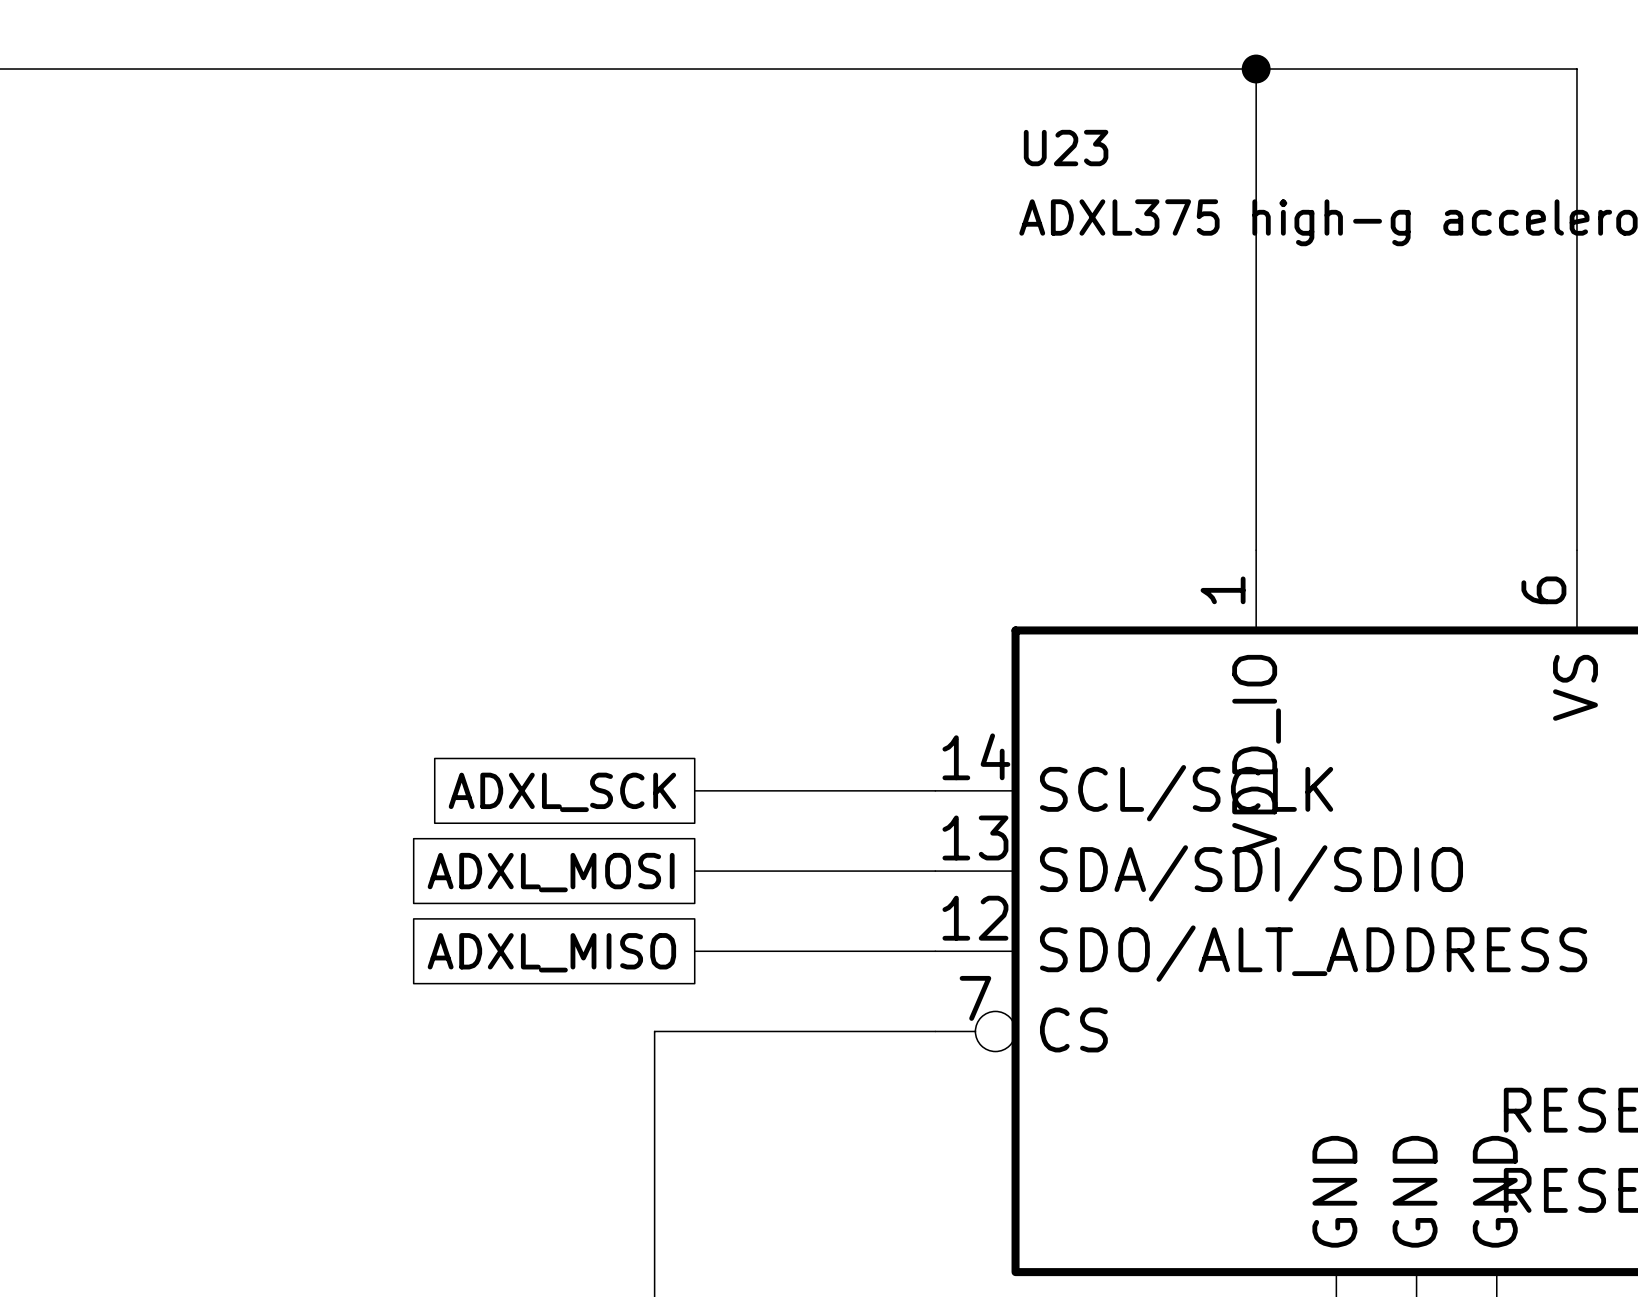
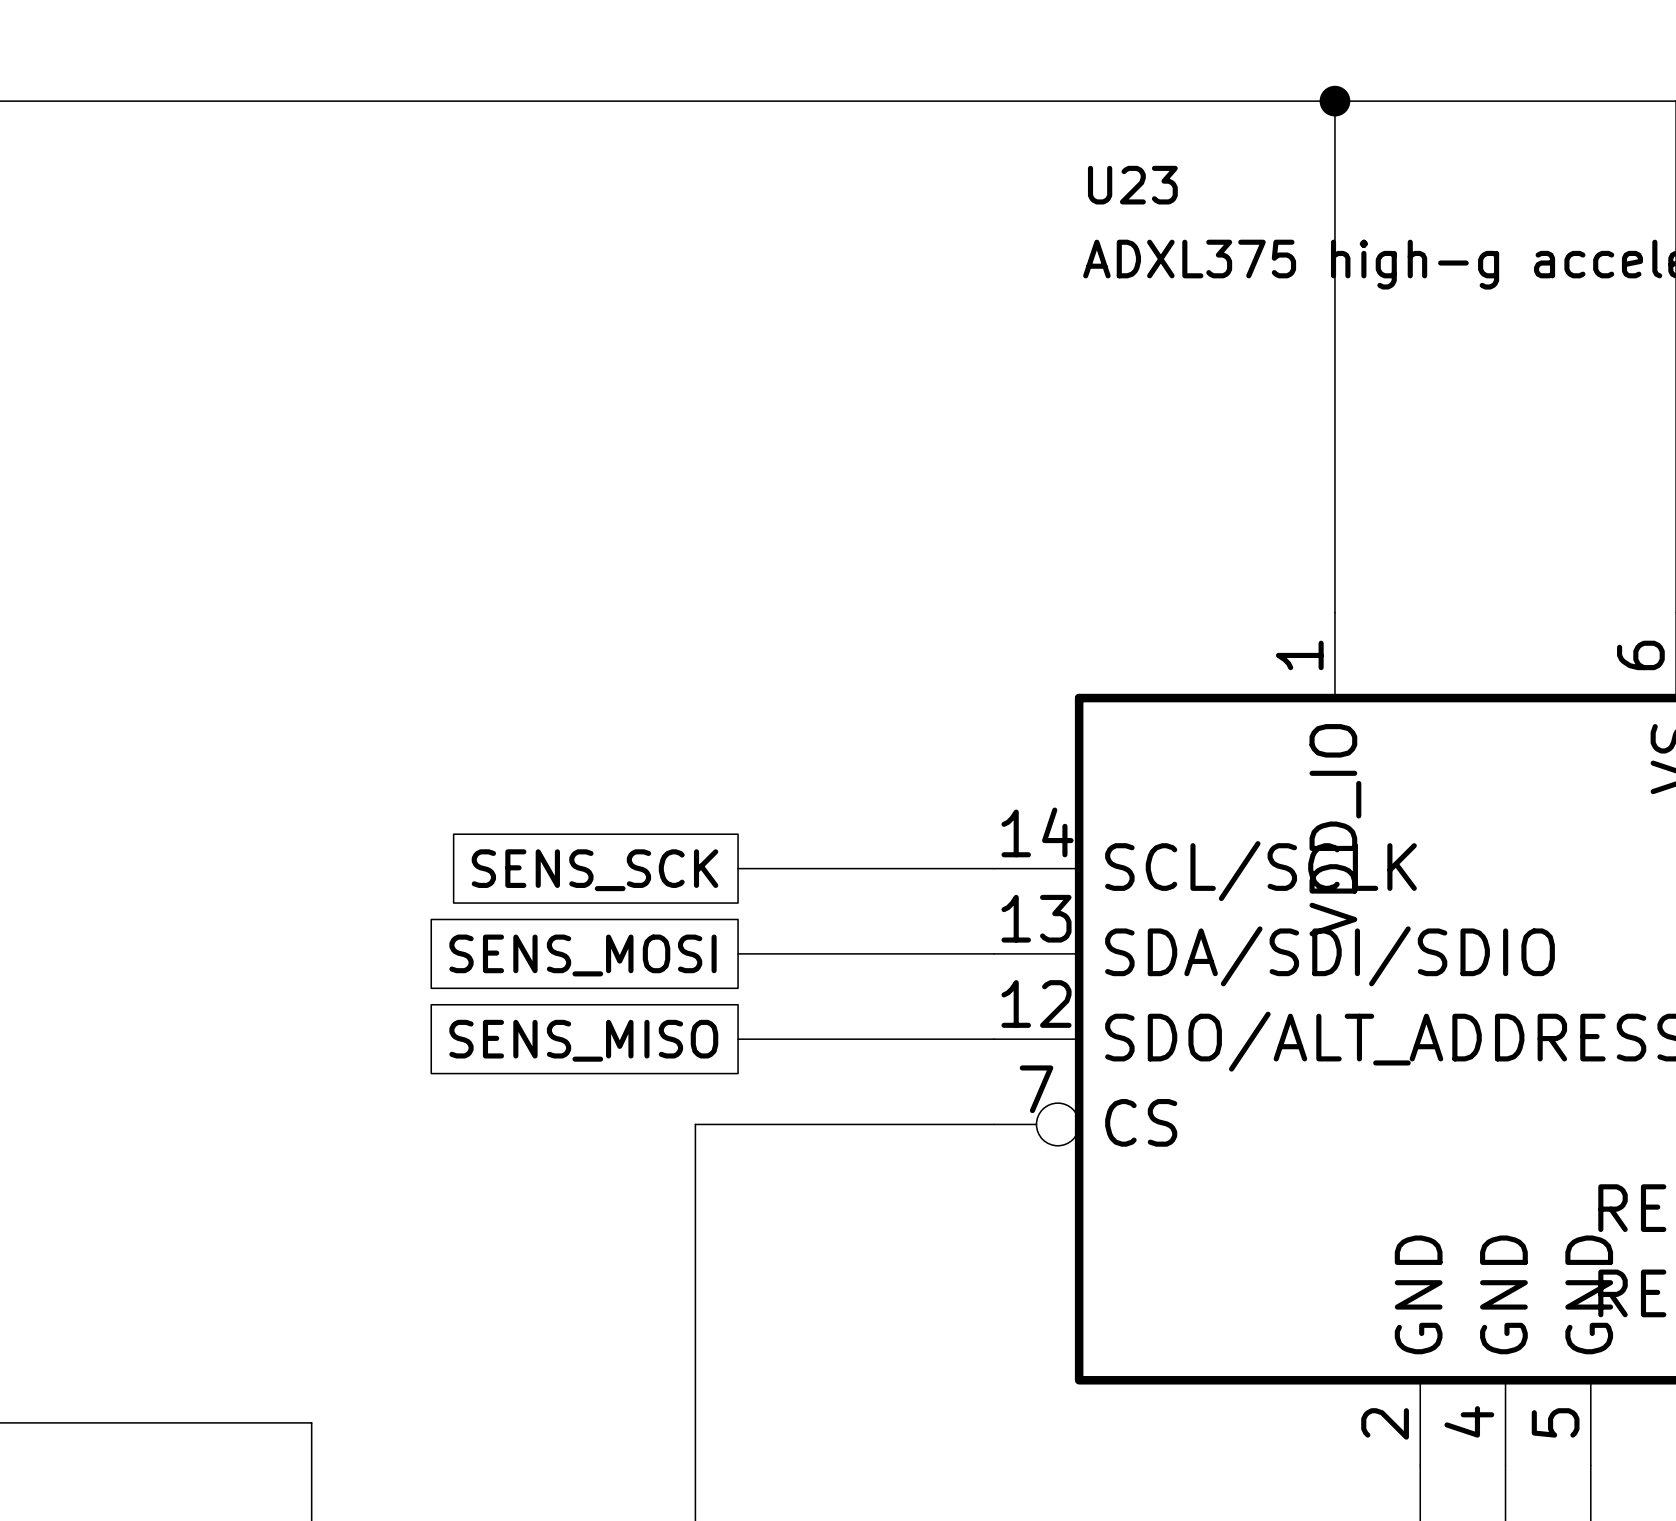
global label: ADXL_SCK (562, 792) -> SENS_SCK (594, 870)
global label: ADXL_MOSI (551, 872) -> SENS_MOSI (583, 955)
global label: ADXL_MISO (551, 952) -> SENS_MISO (583, 1040)

